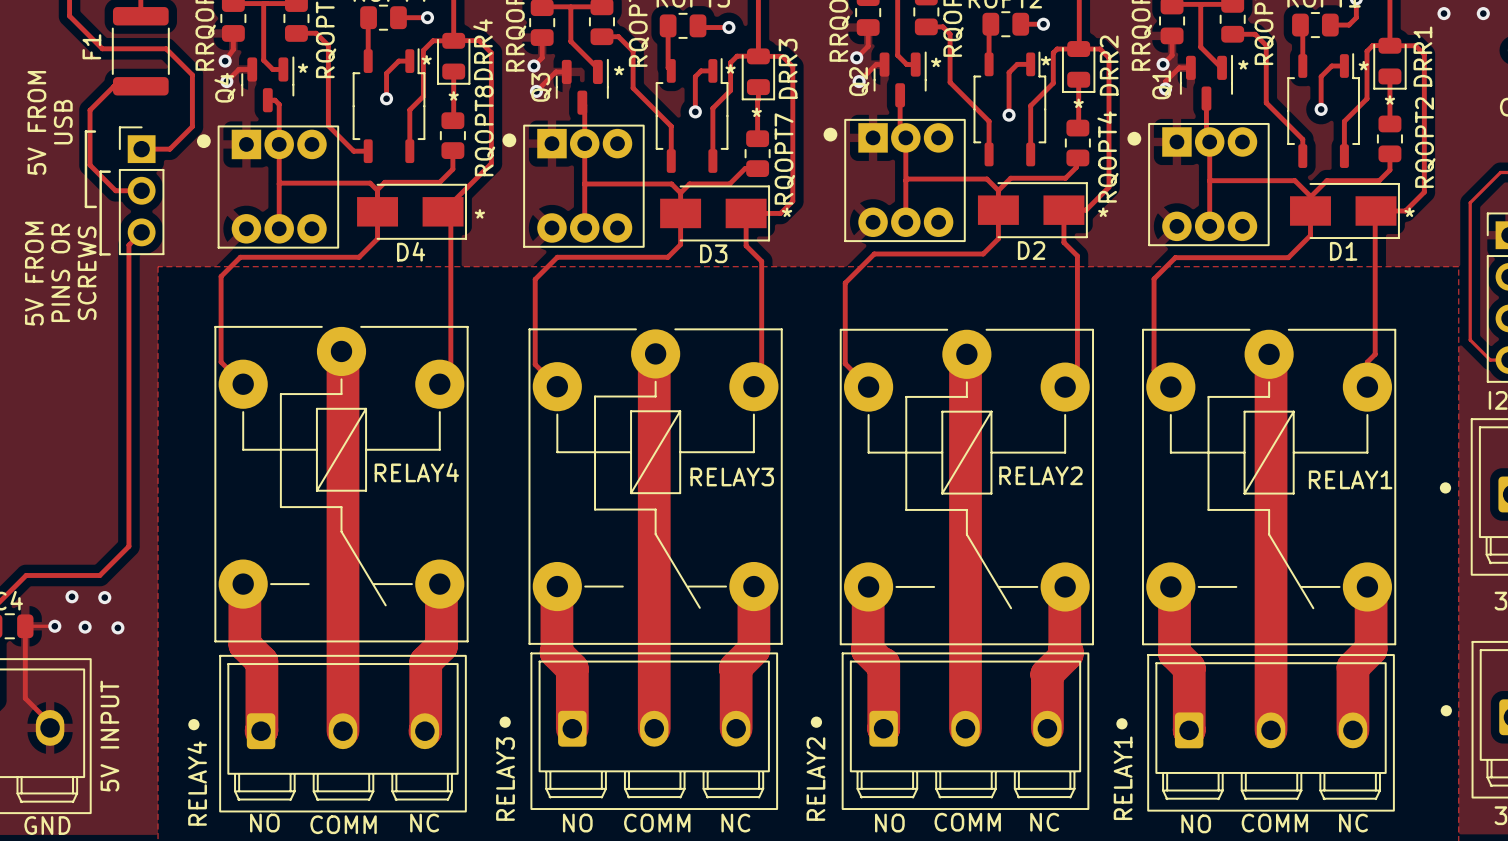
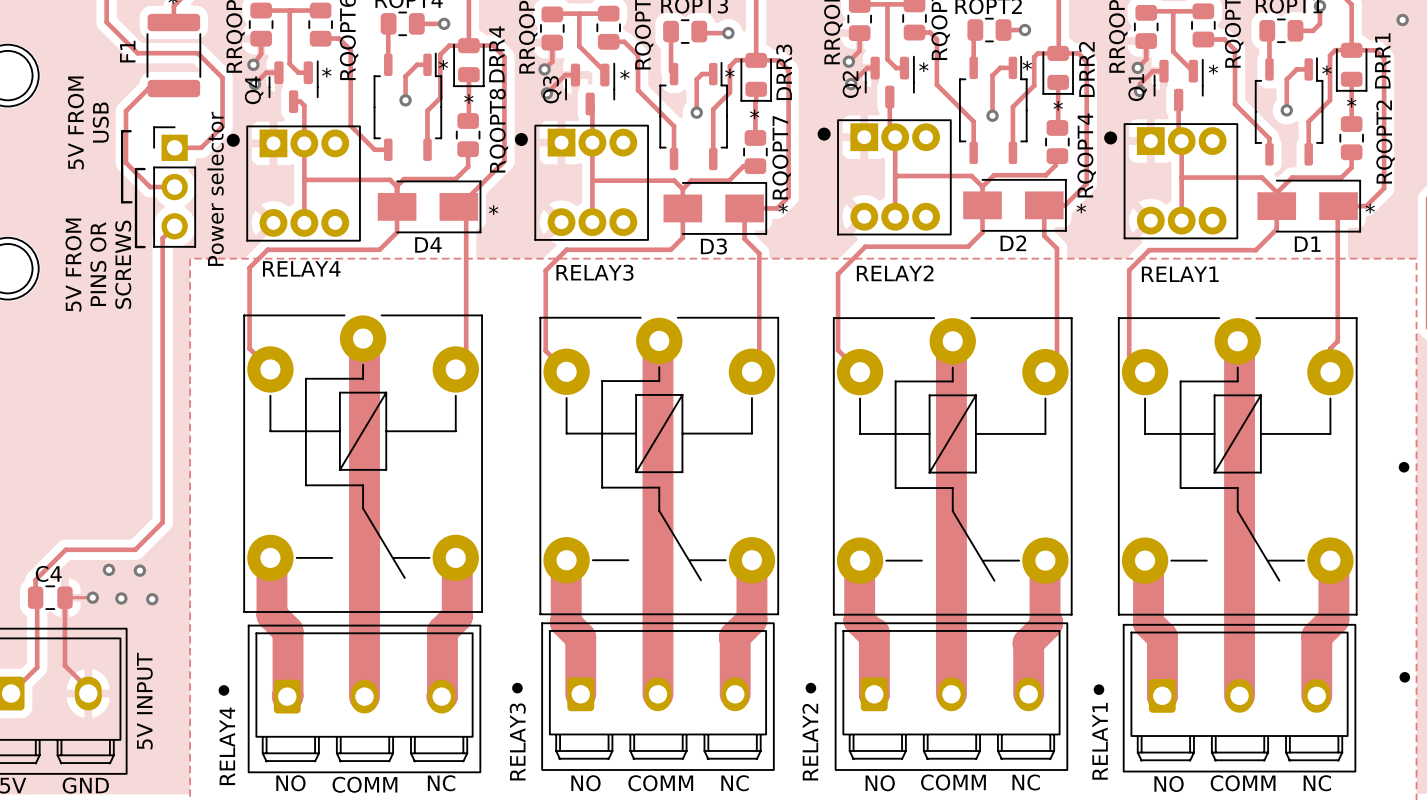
text: none -> Power selector (215, 188)
RELAY4 name position: RELAY4 (416, 472) -> RELAY4 (301, 268)
RELAY2 name position: RELAY2 (1040, 475) -> RELAY2 (895, 273)
RELAY3 name position: RELAY3 (732, 476) -> RELAY3 (594, 272)
RELAY1 name position: RELAY1 (1350, 479) -> RELAY1 (1180, 274)

